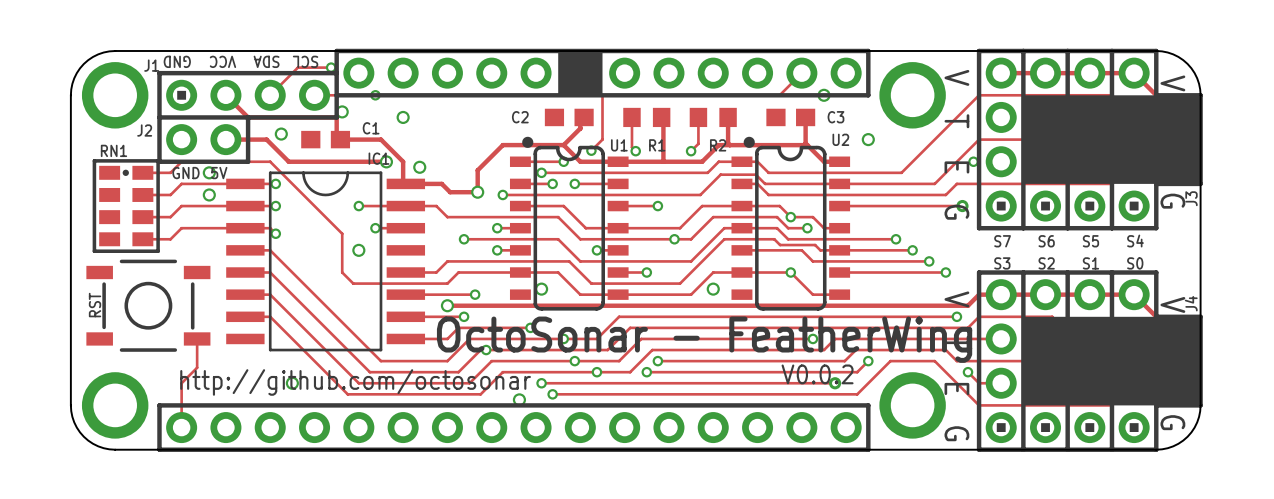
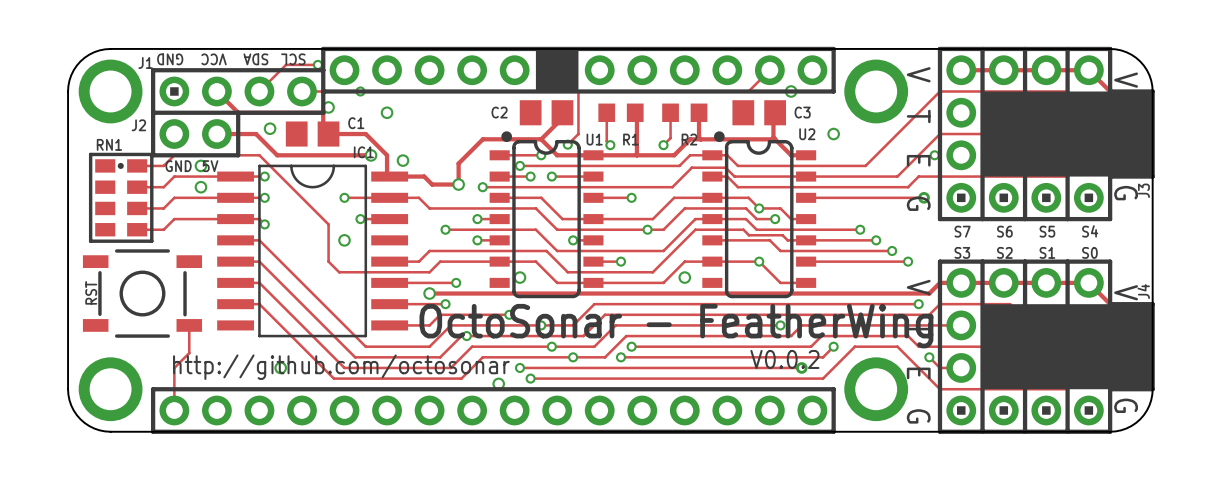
C2 footprint: [544, 108, 594, 127] -> [519, 100, 574, 126]
C3 footprint: [766, 108, 816, 127] -> [732, 100, 787, 126]
C1 footprint: [301, 130, 351, 149] -> [285, 121, 340, 147]

